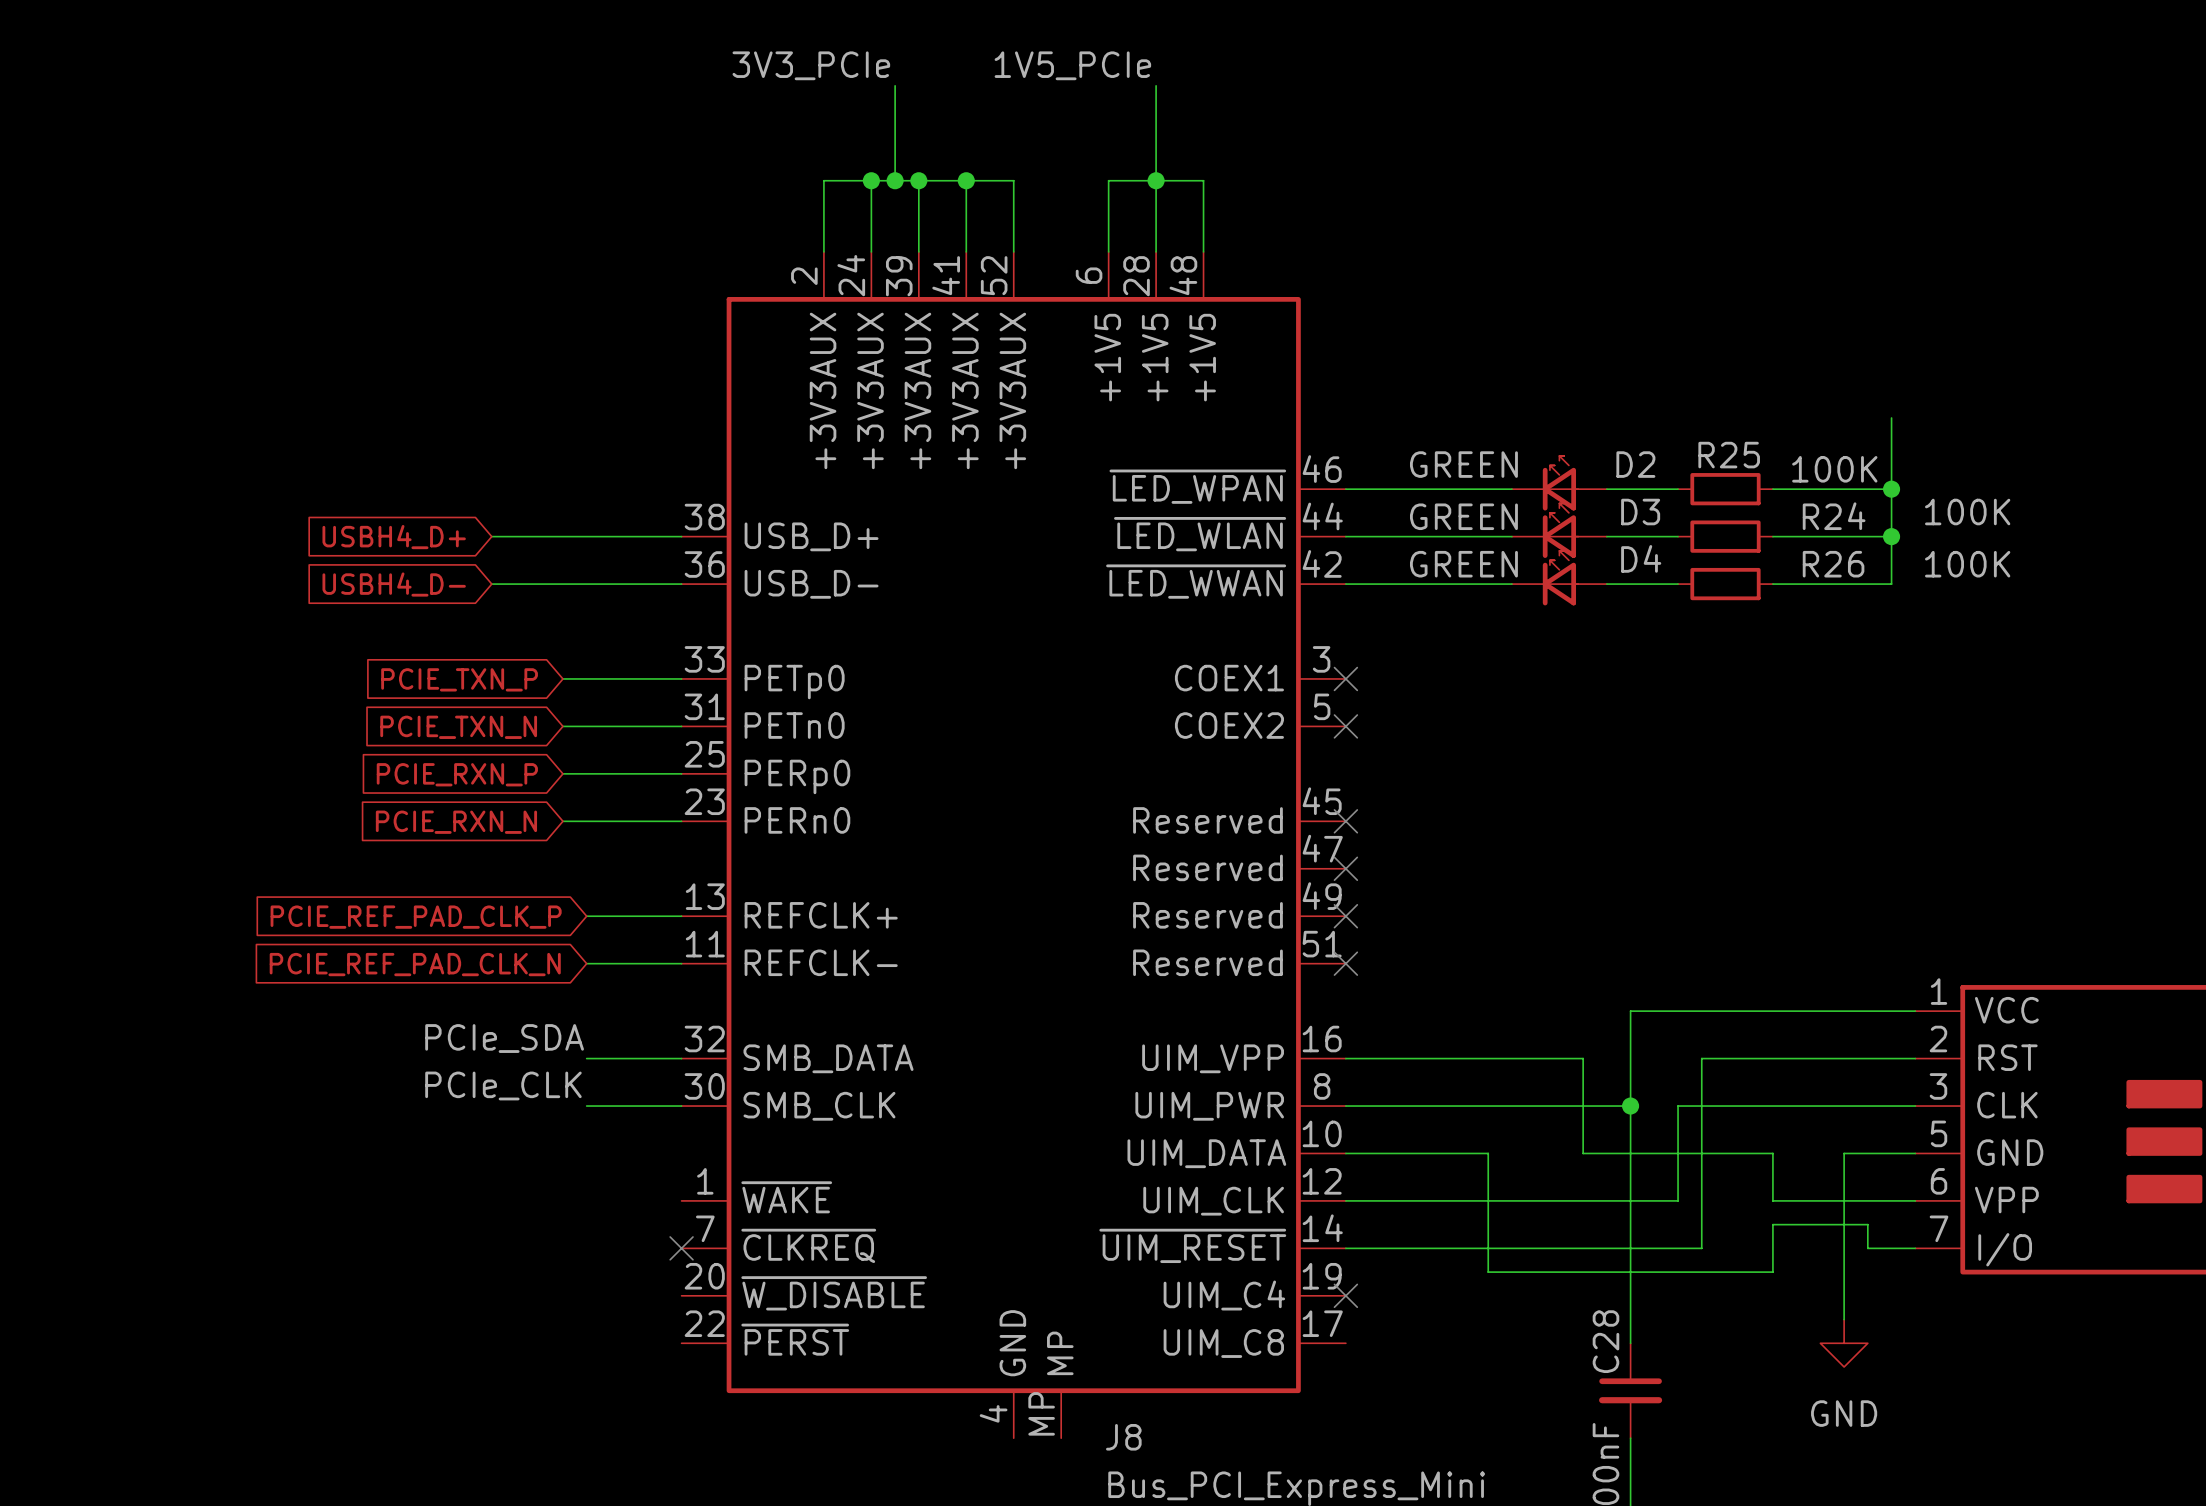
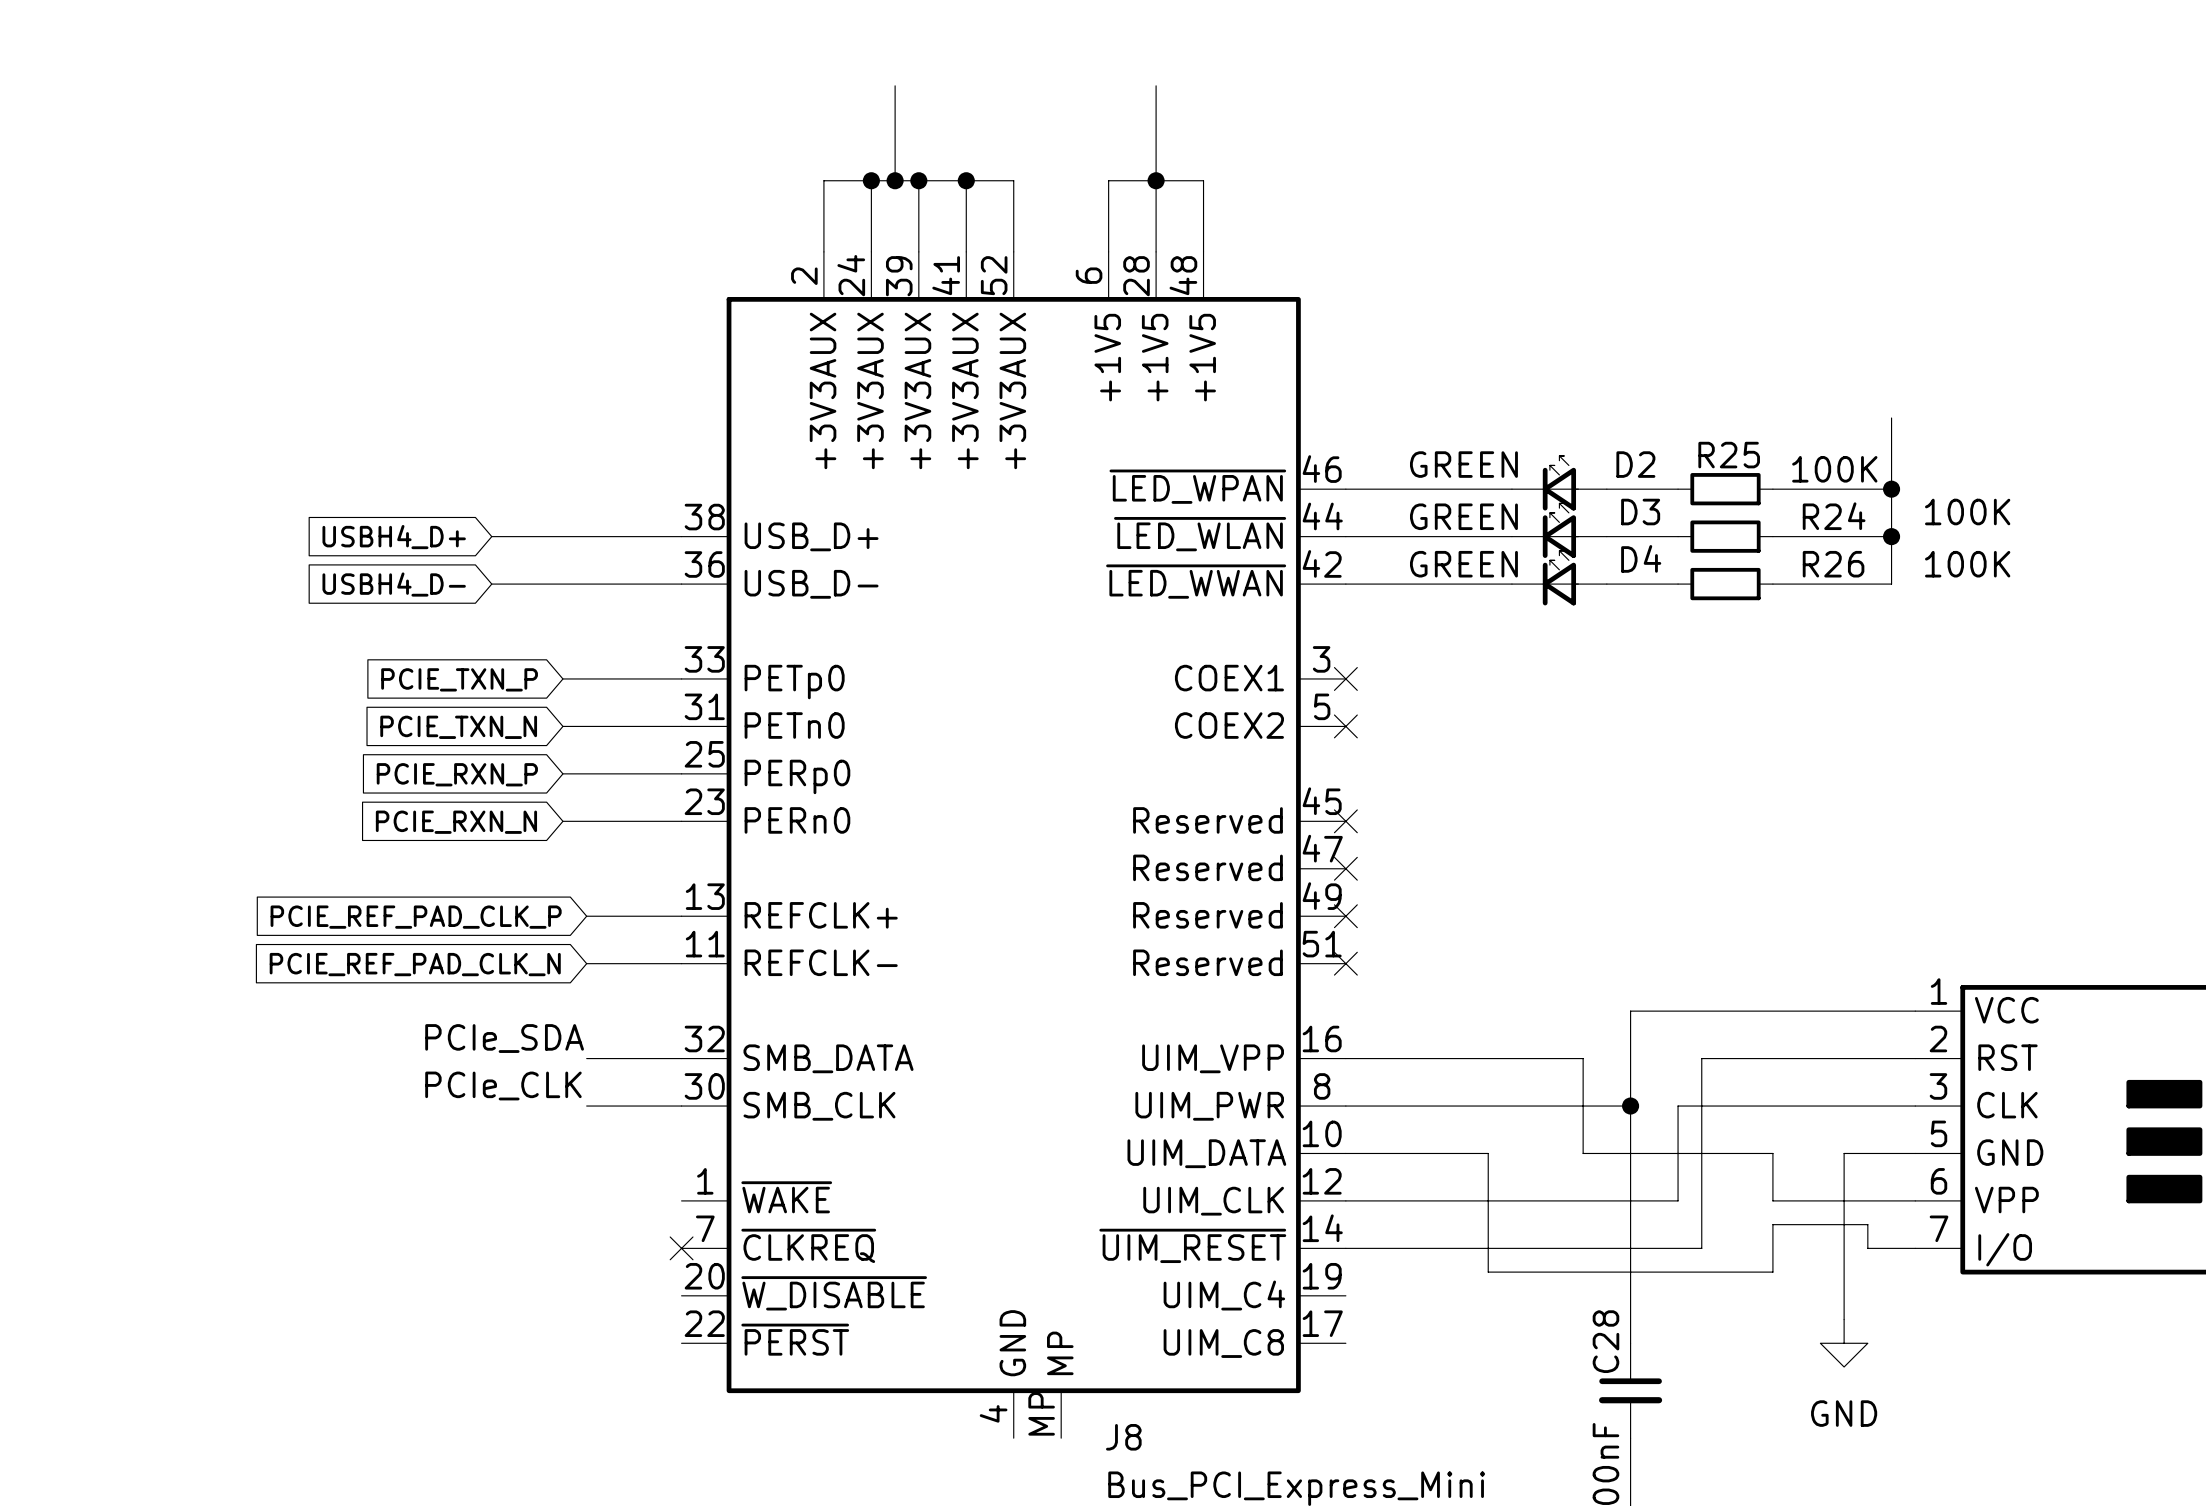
label: 3V3_PCIe (811, 65) -> none
label: 1V5_PCIe (1072, 65) -> none
no-connect mark: (1345, 1295) -> none

